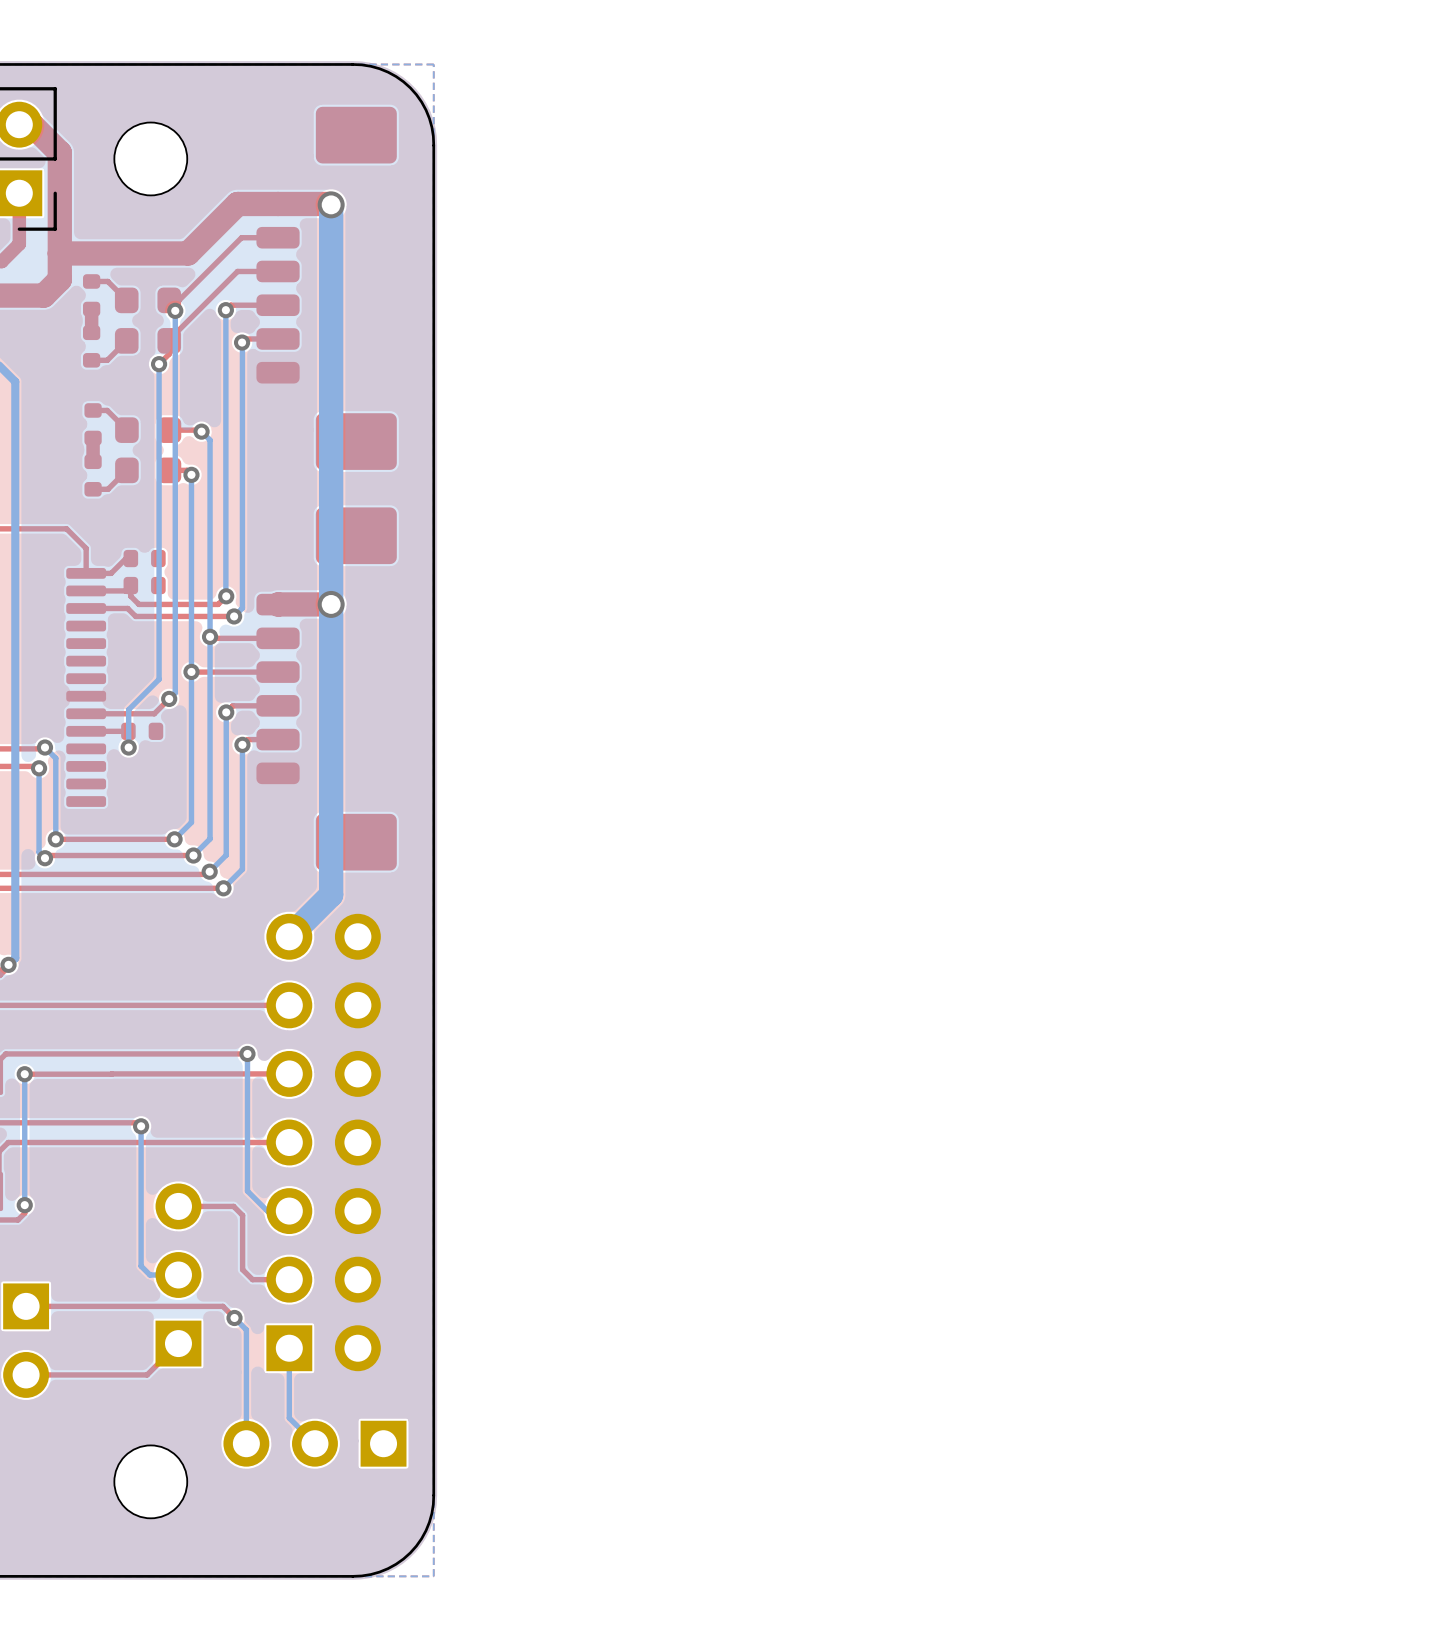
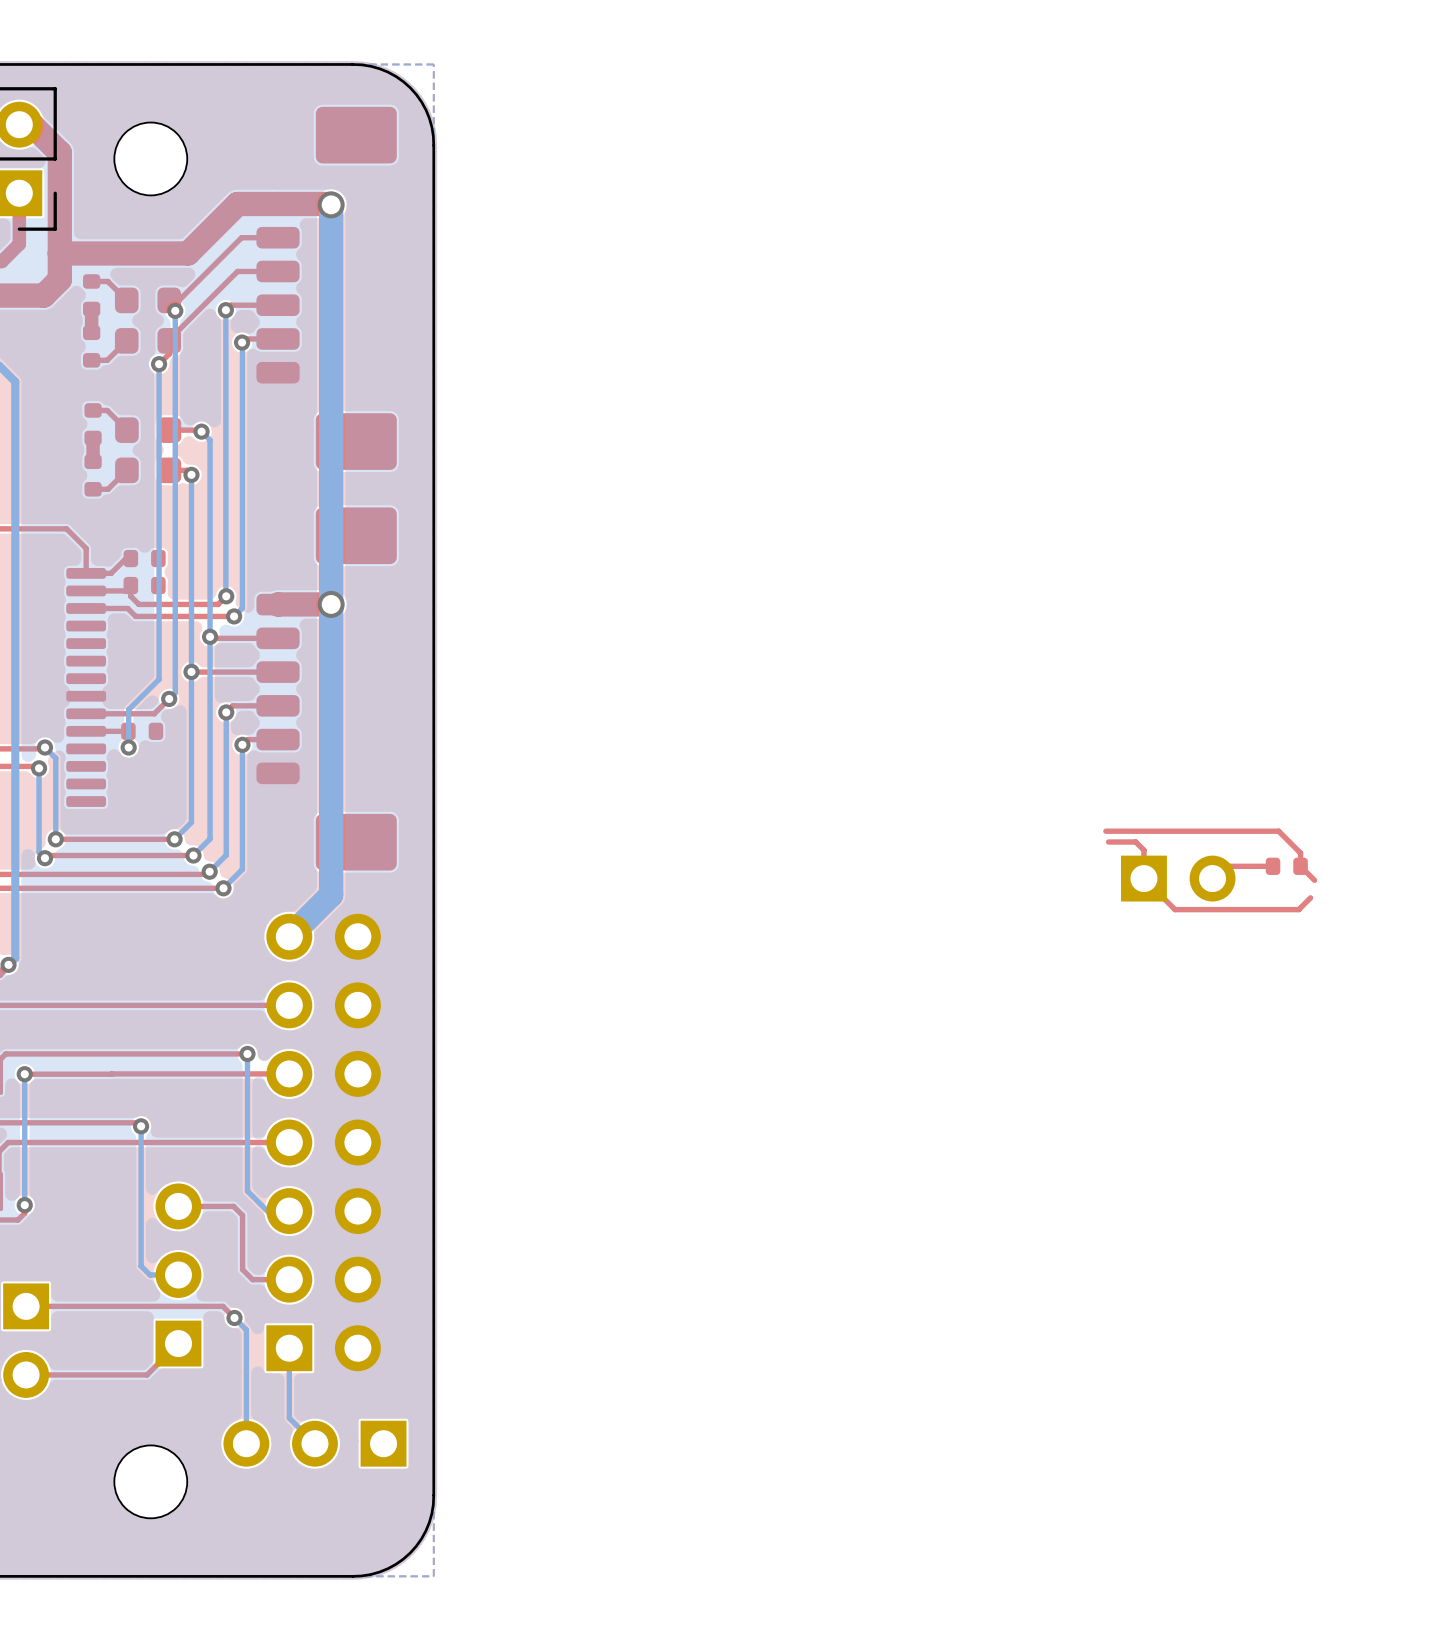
top track: none -> (1105, 831) (1278, 831) (1300, 853) (1300, 866) (1314, 880)
top track: none -> (1108, 842) (1135, 842) (1143, 850) (1143, 878) (1175, 909) (1298, 909) (1310, 897)
top track: none -> (1273, 866) (1224, 866) (1212, 878)
part: none -> (1286, 866)
part: none -> (1178, 878)

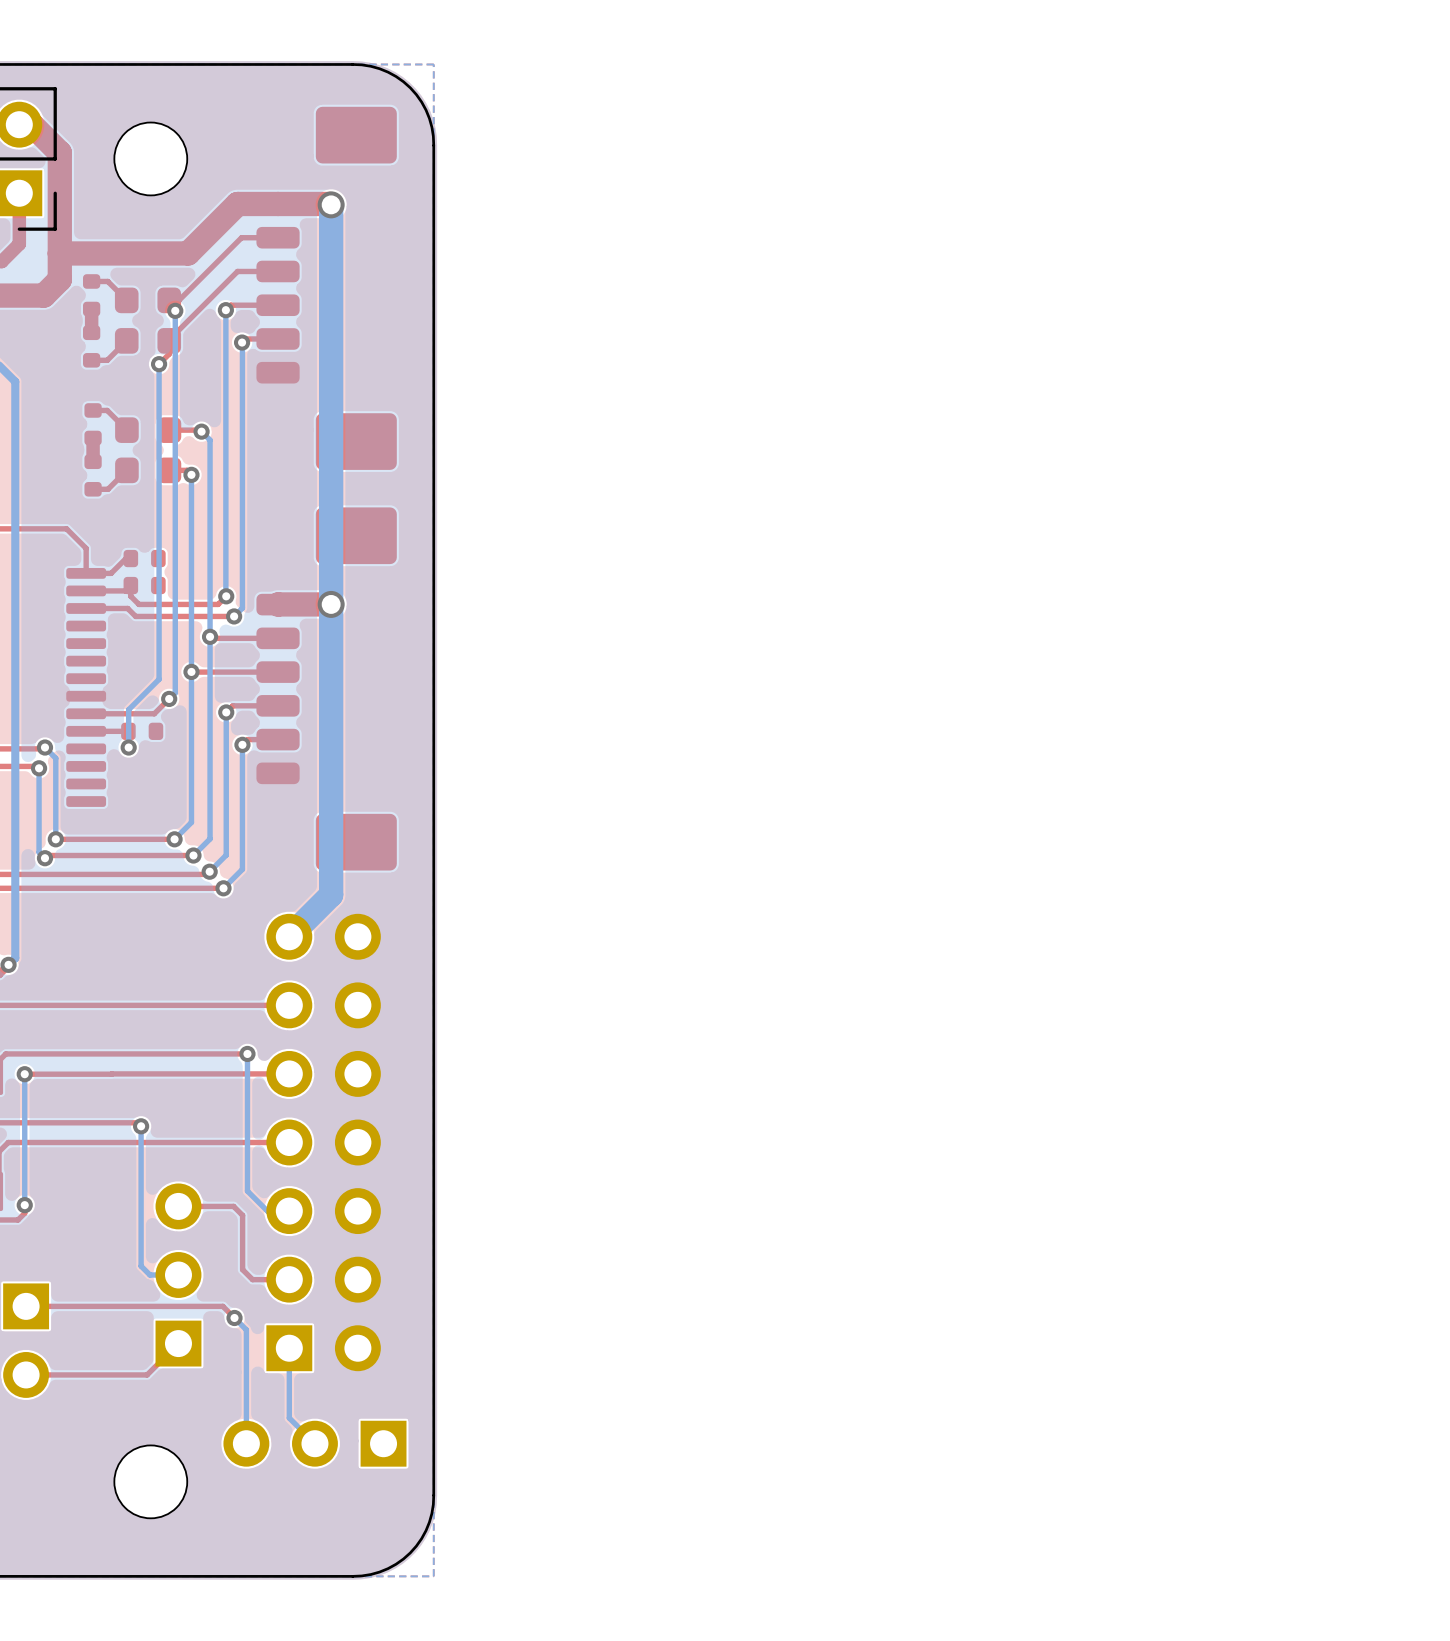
top track: (1105, 831) (1278, 831) (1300, 853) (1300, 866) (1314, 880) -> none
top track: (1108, 842) (1135, 842) (1143, 850) (1143, 878) (1175, 909) (1298, 909) (1310, 897) -> none
top track: (1273, 866) (1224, 866) (1212, 878) -> none
part: (1286, 866) -> none
part: (1178, 878) -> none

